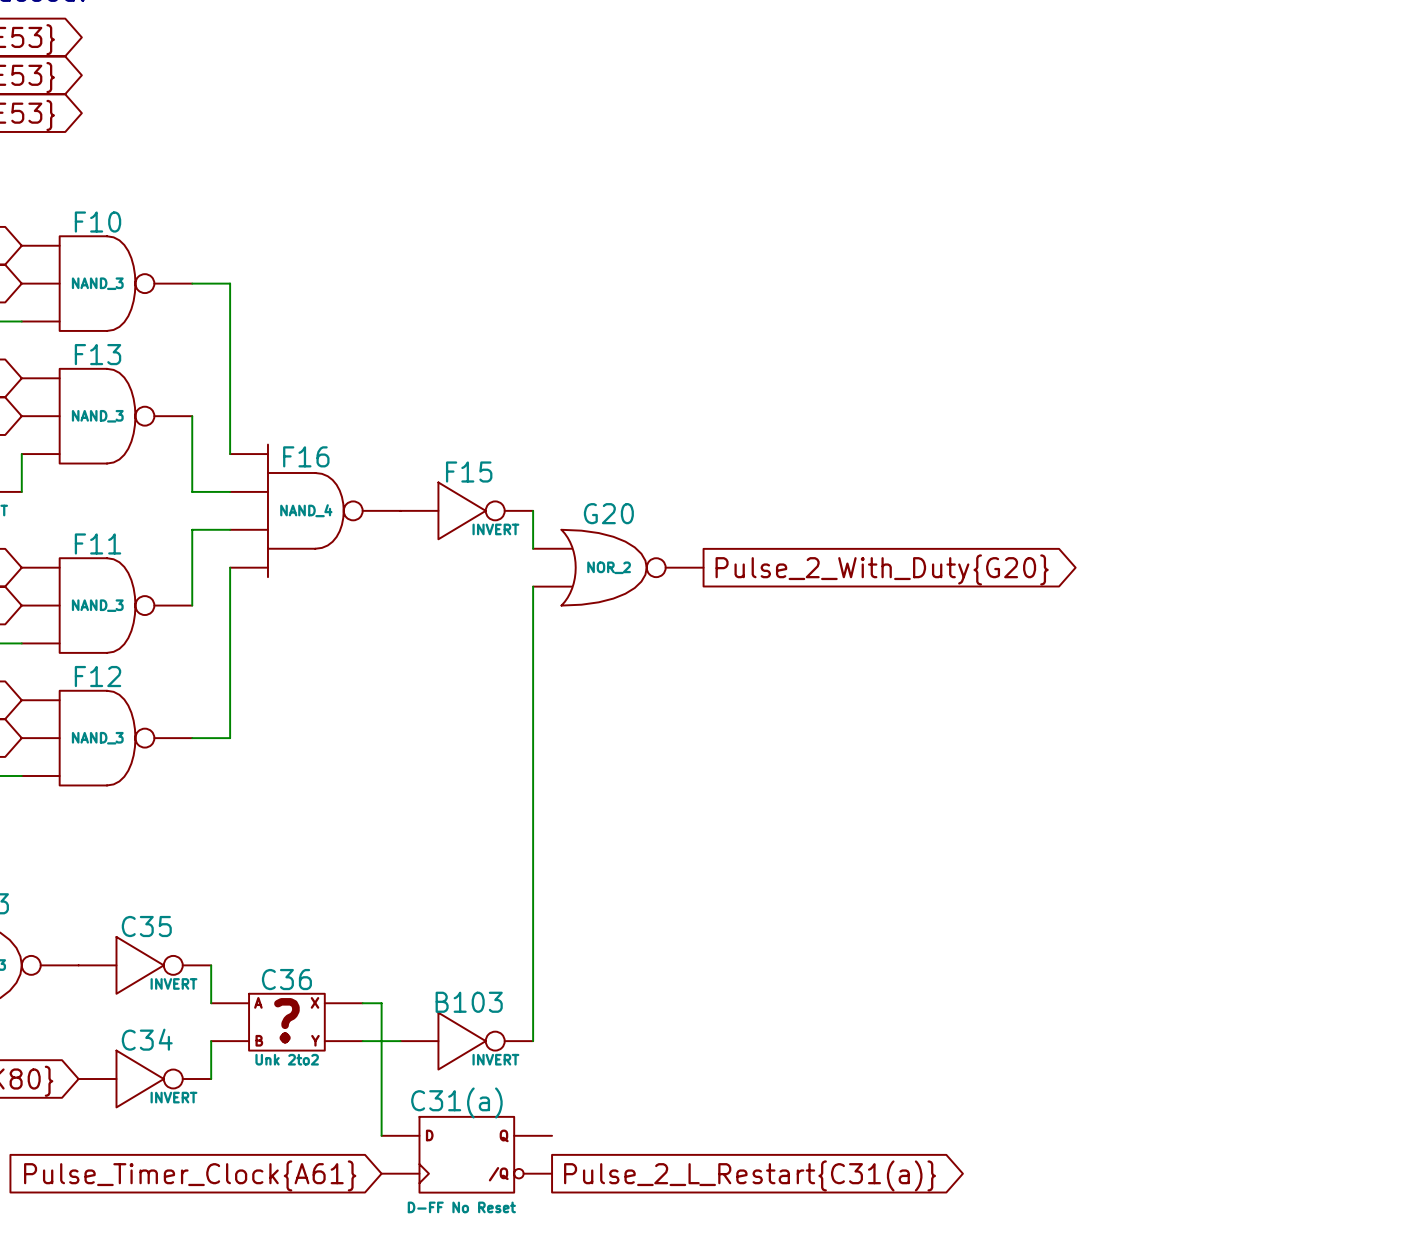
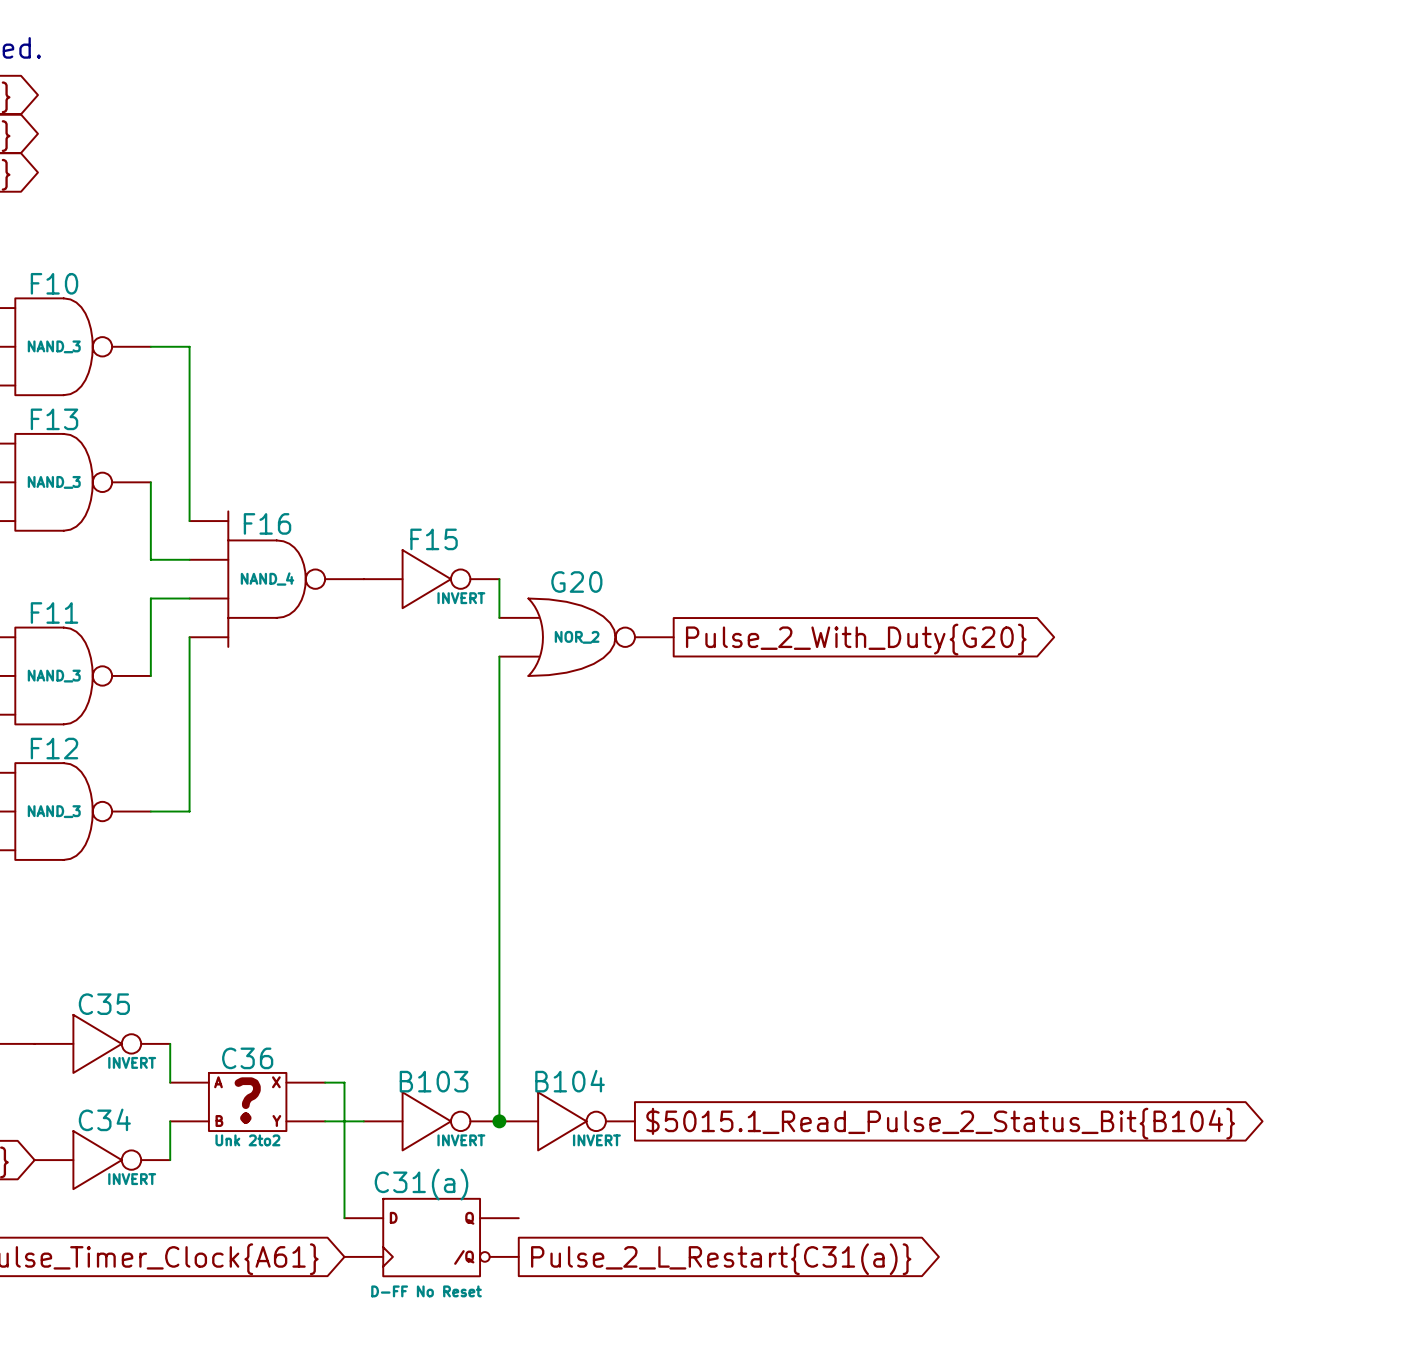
junction: none -> (499, 1121)
B104: none -> INVERT (567, 1121)
global label: none -> $5015.1_Read_Pulse_2_Status_Bit{B104} (940, 1123)

